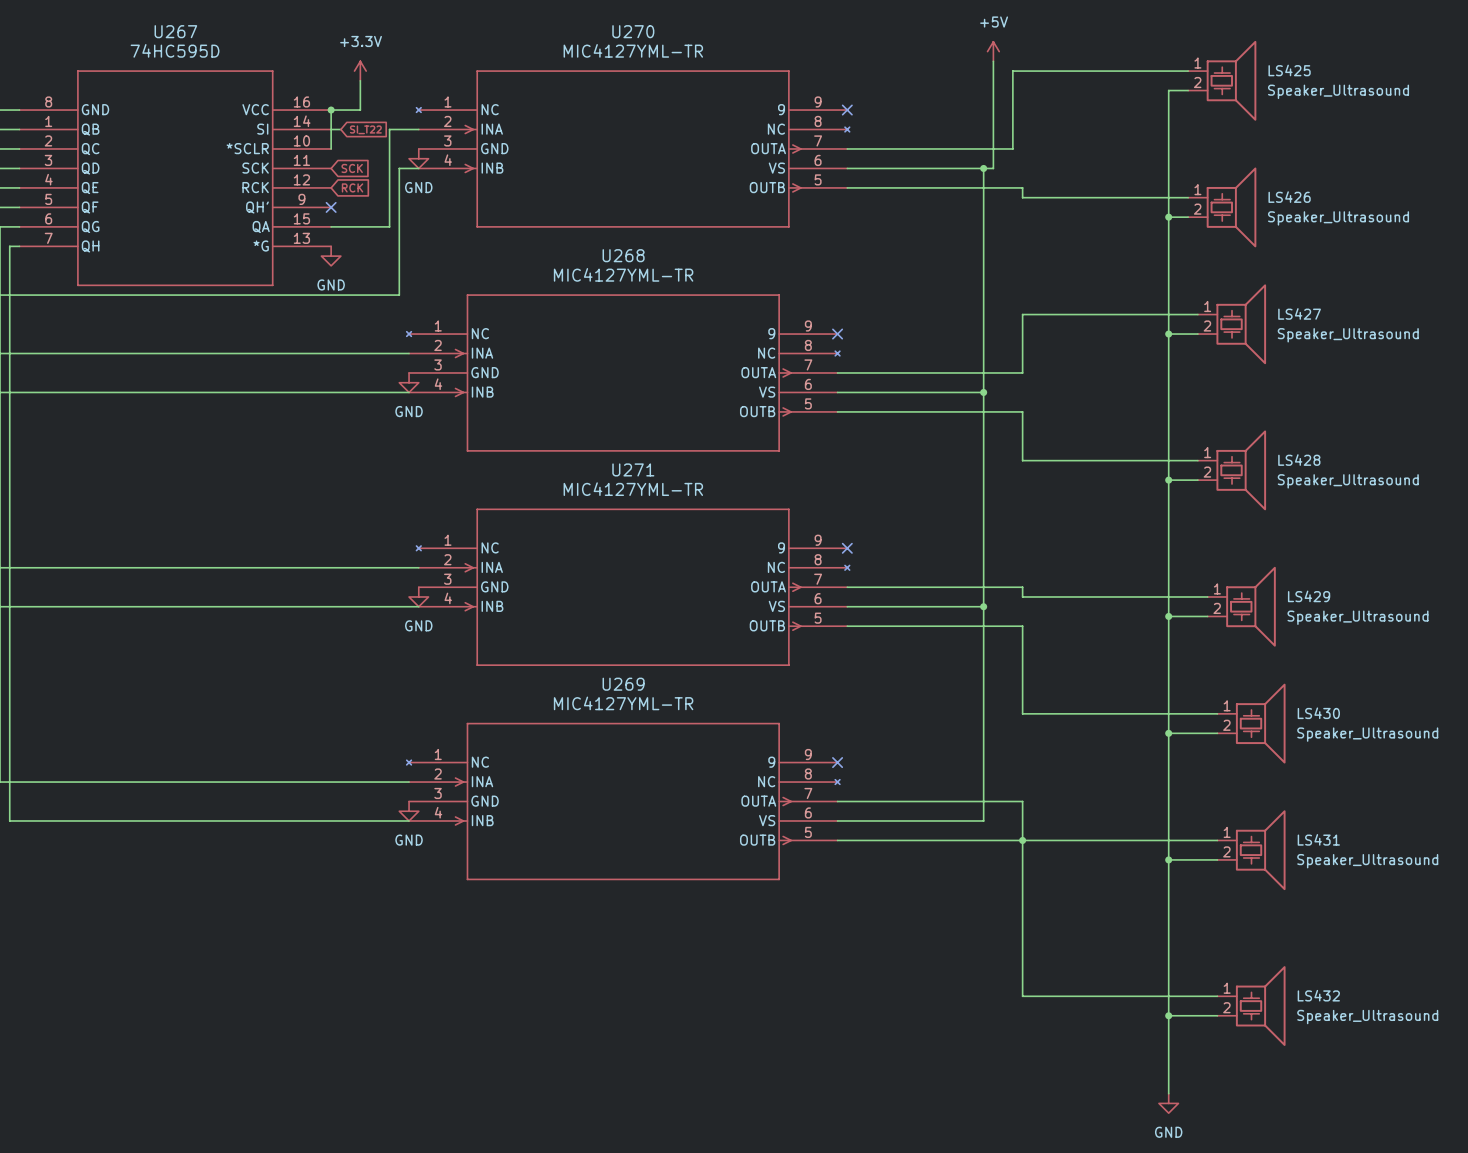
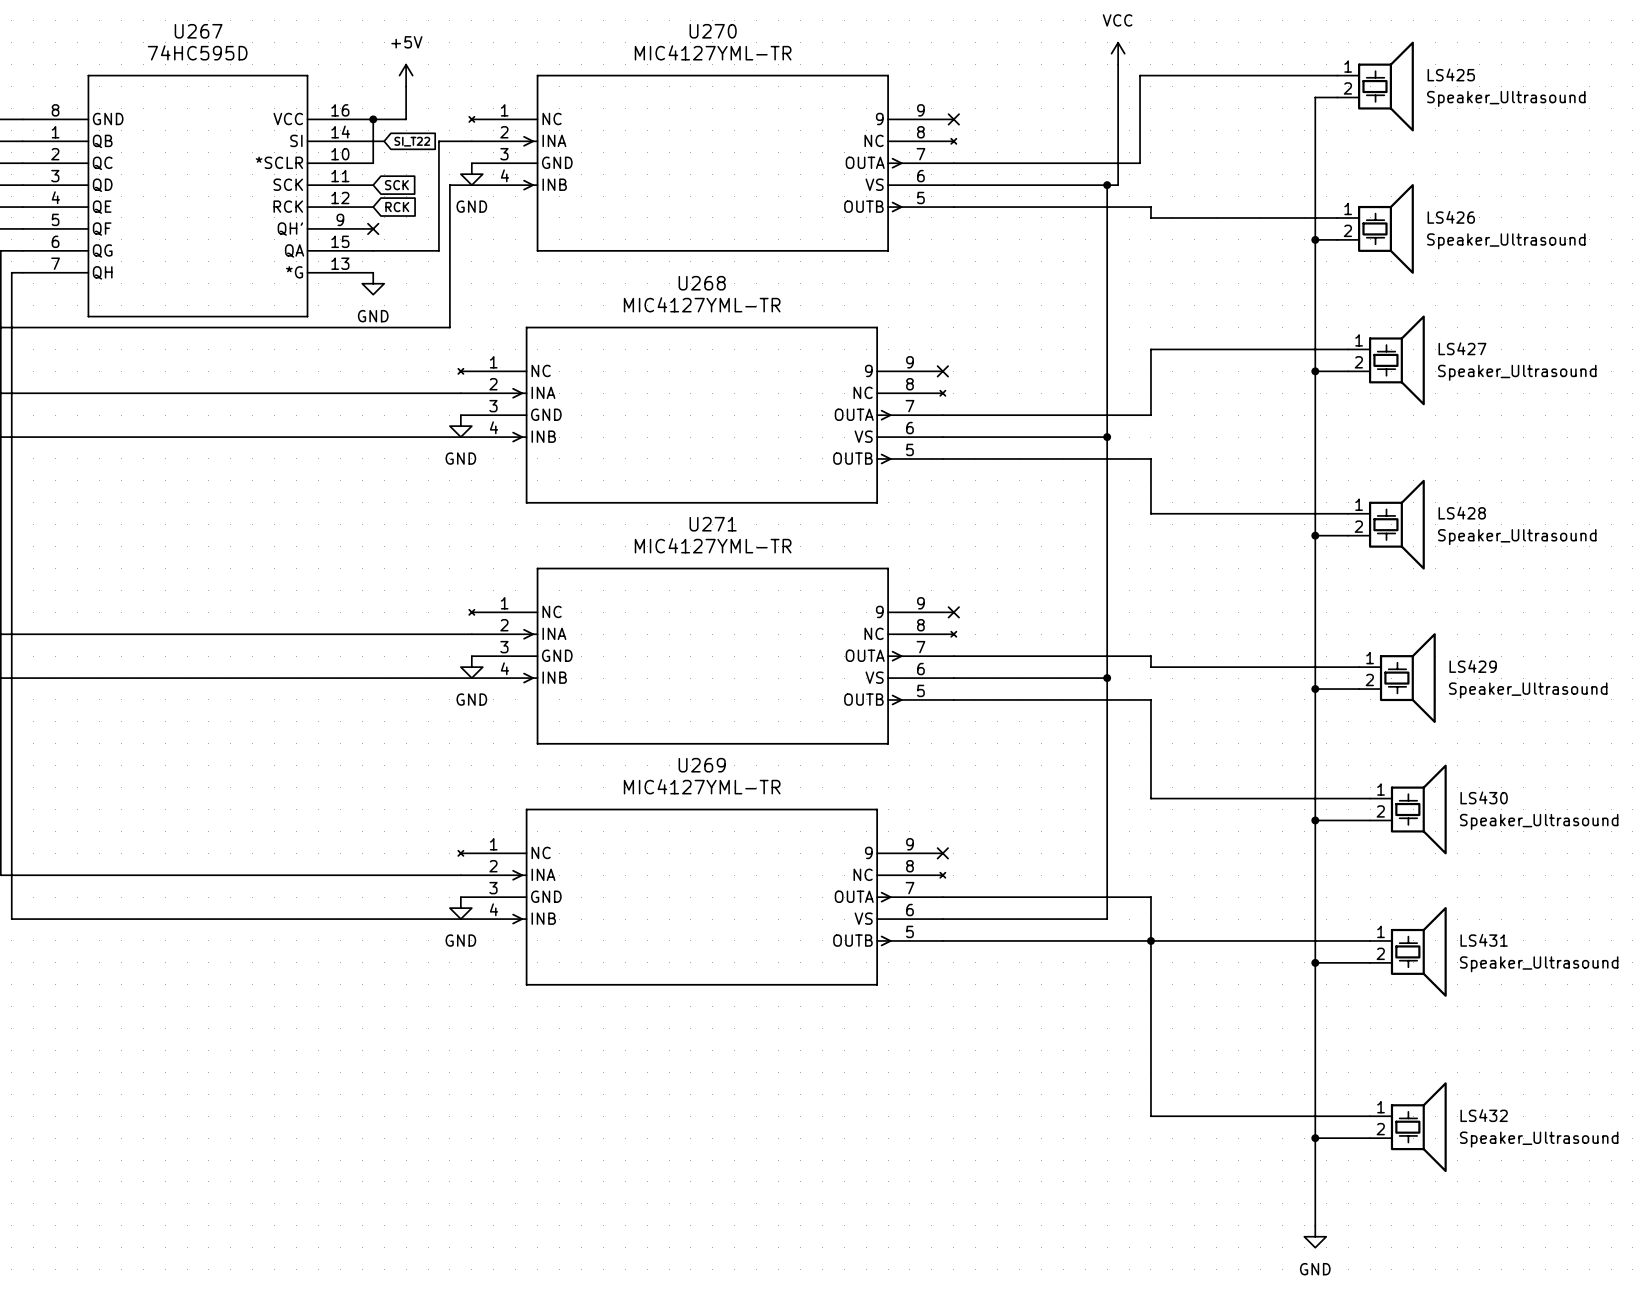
power symbol: +5V (993, 51) -> VCC (1118, 53)
power symbol: +3.3V (360, 71) -> +5V (406, 75)

